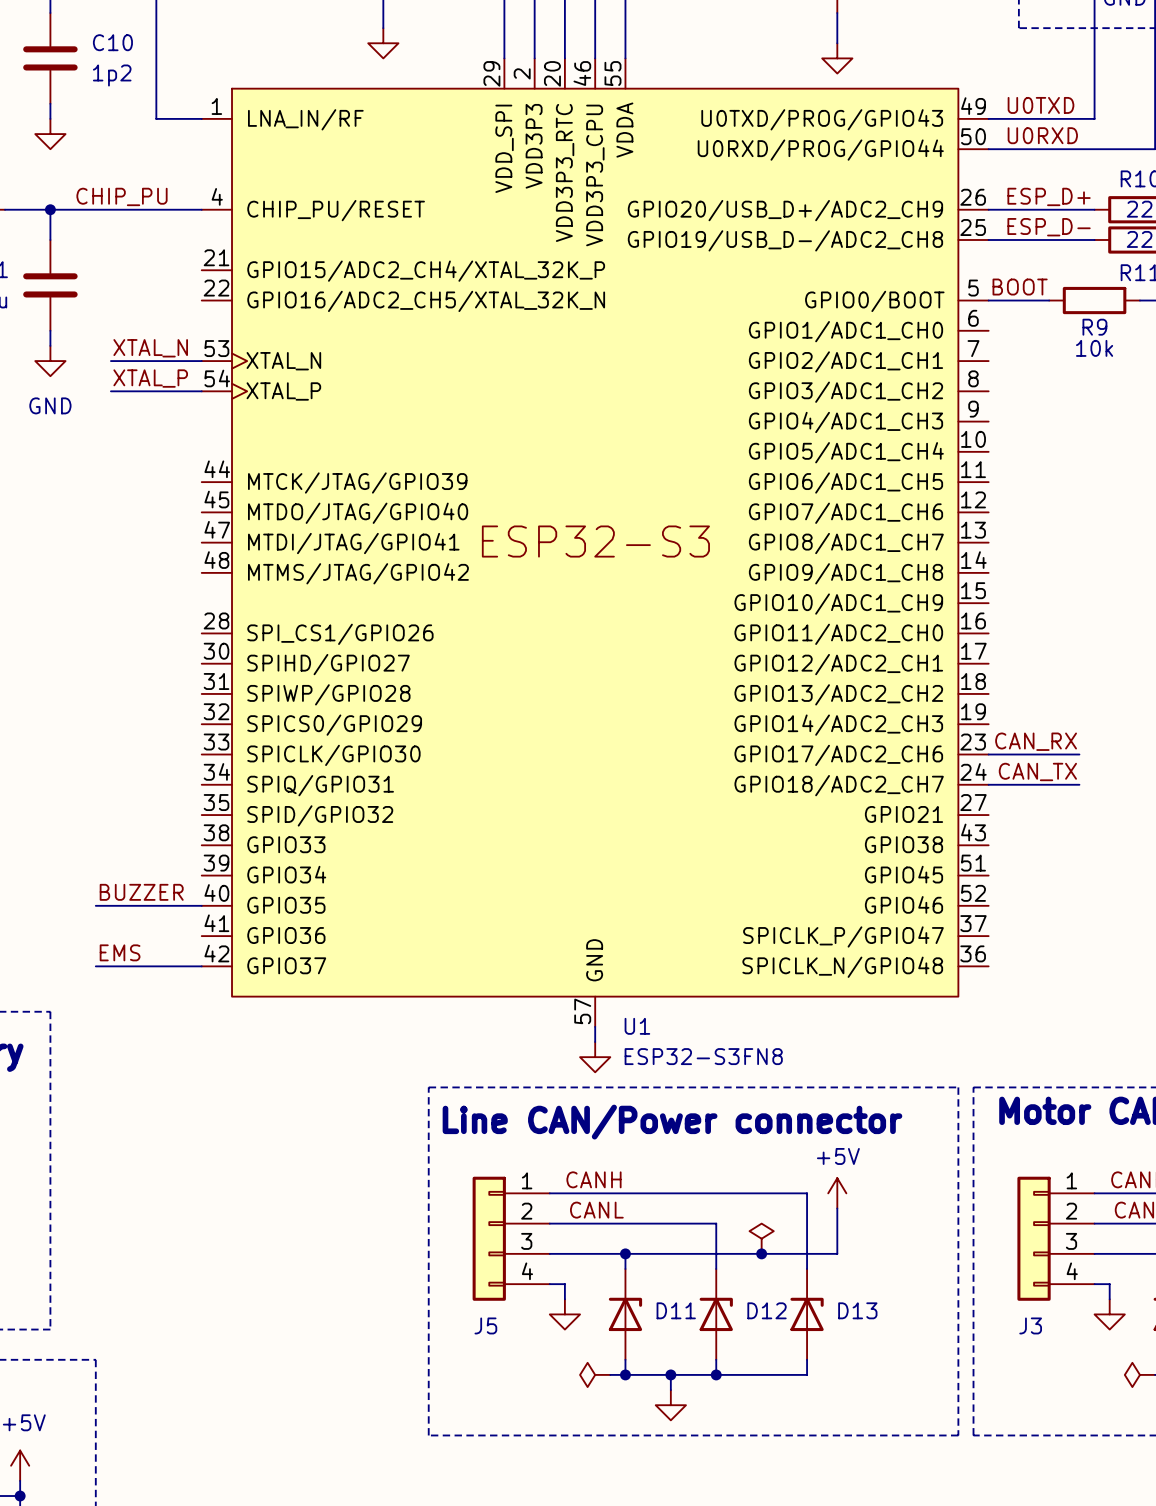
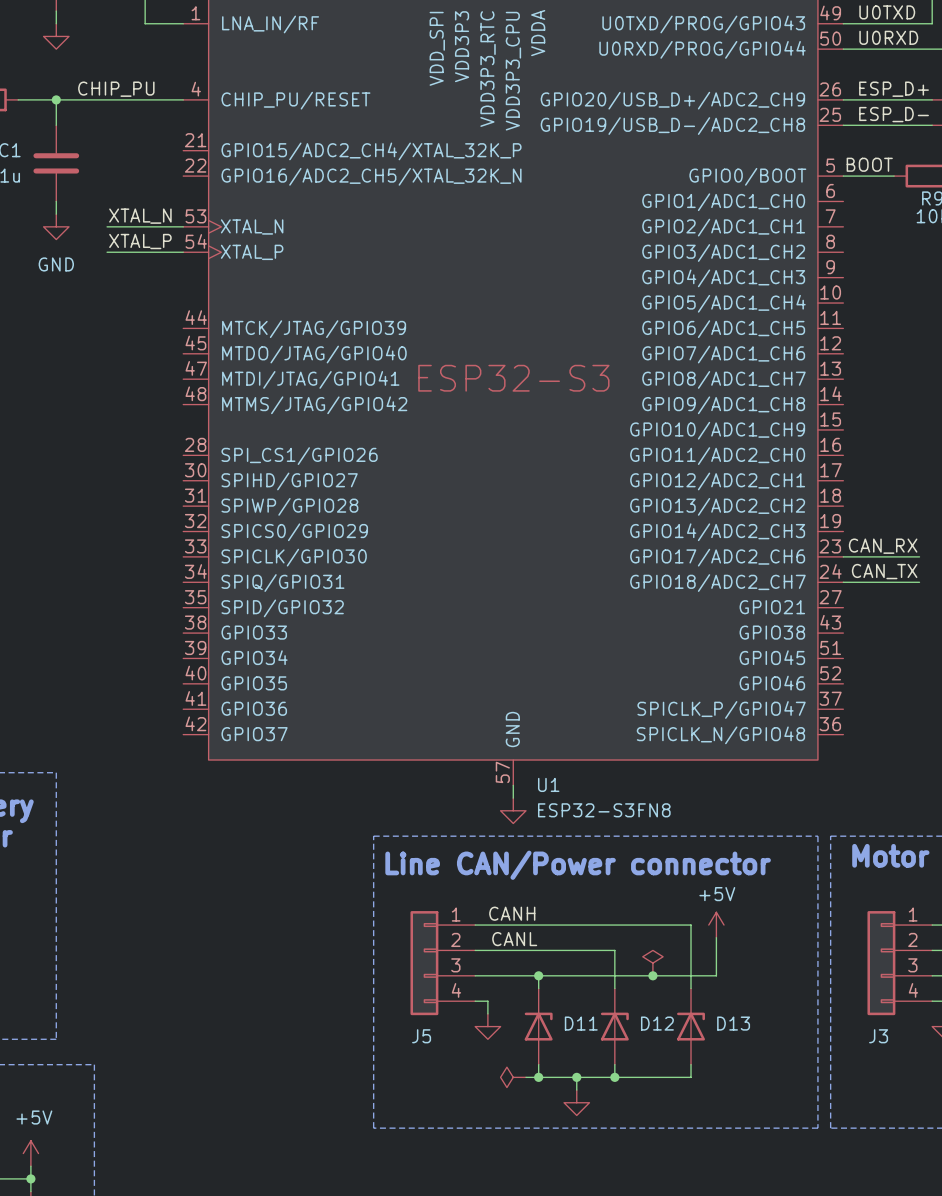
label: BUZZER (141, 892) -> none
wire: (95, 905) (201, 905) -> none
label: EMS (120, 952) -> none
wire: (95, 966) (201, 966) -> none

